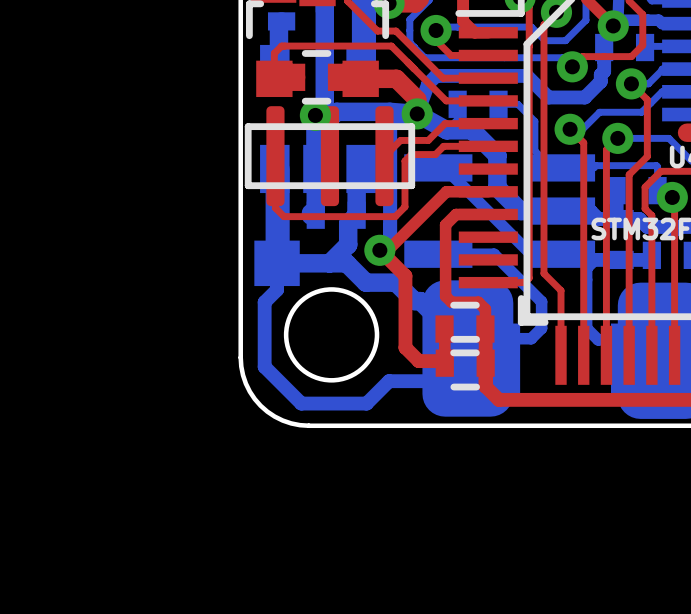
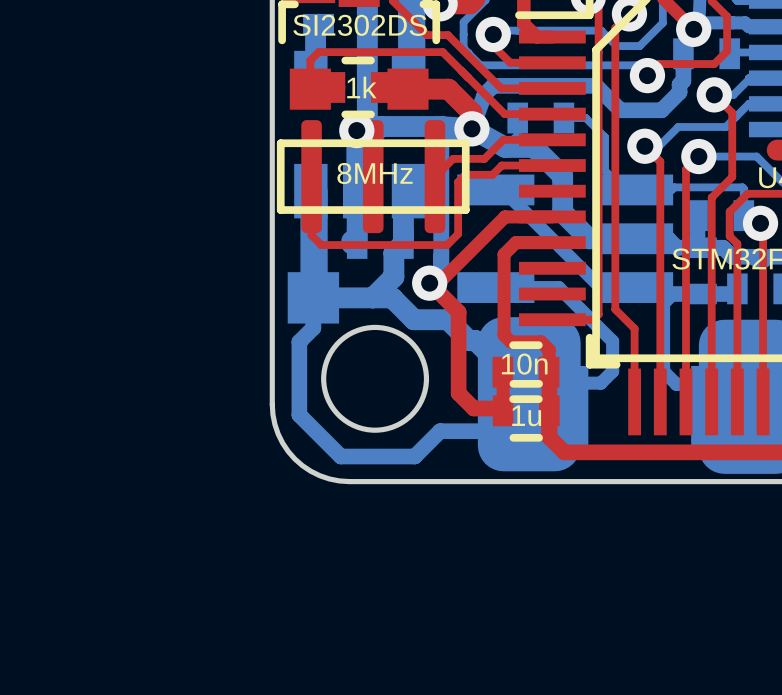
part value: none -> SI2302DS (360, 25)
part value: none -> 1k (361, 87)
part value: none -> 8MHz (374, 173)
part value: none -> 10n (524, 364)
part value: none -> 1u (526, 415)

